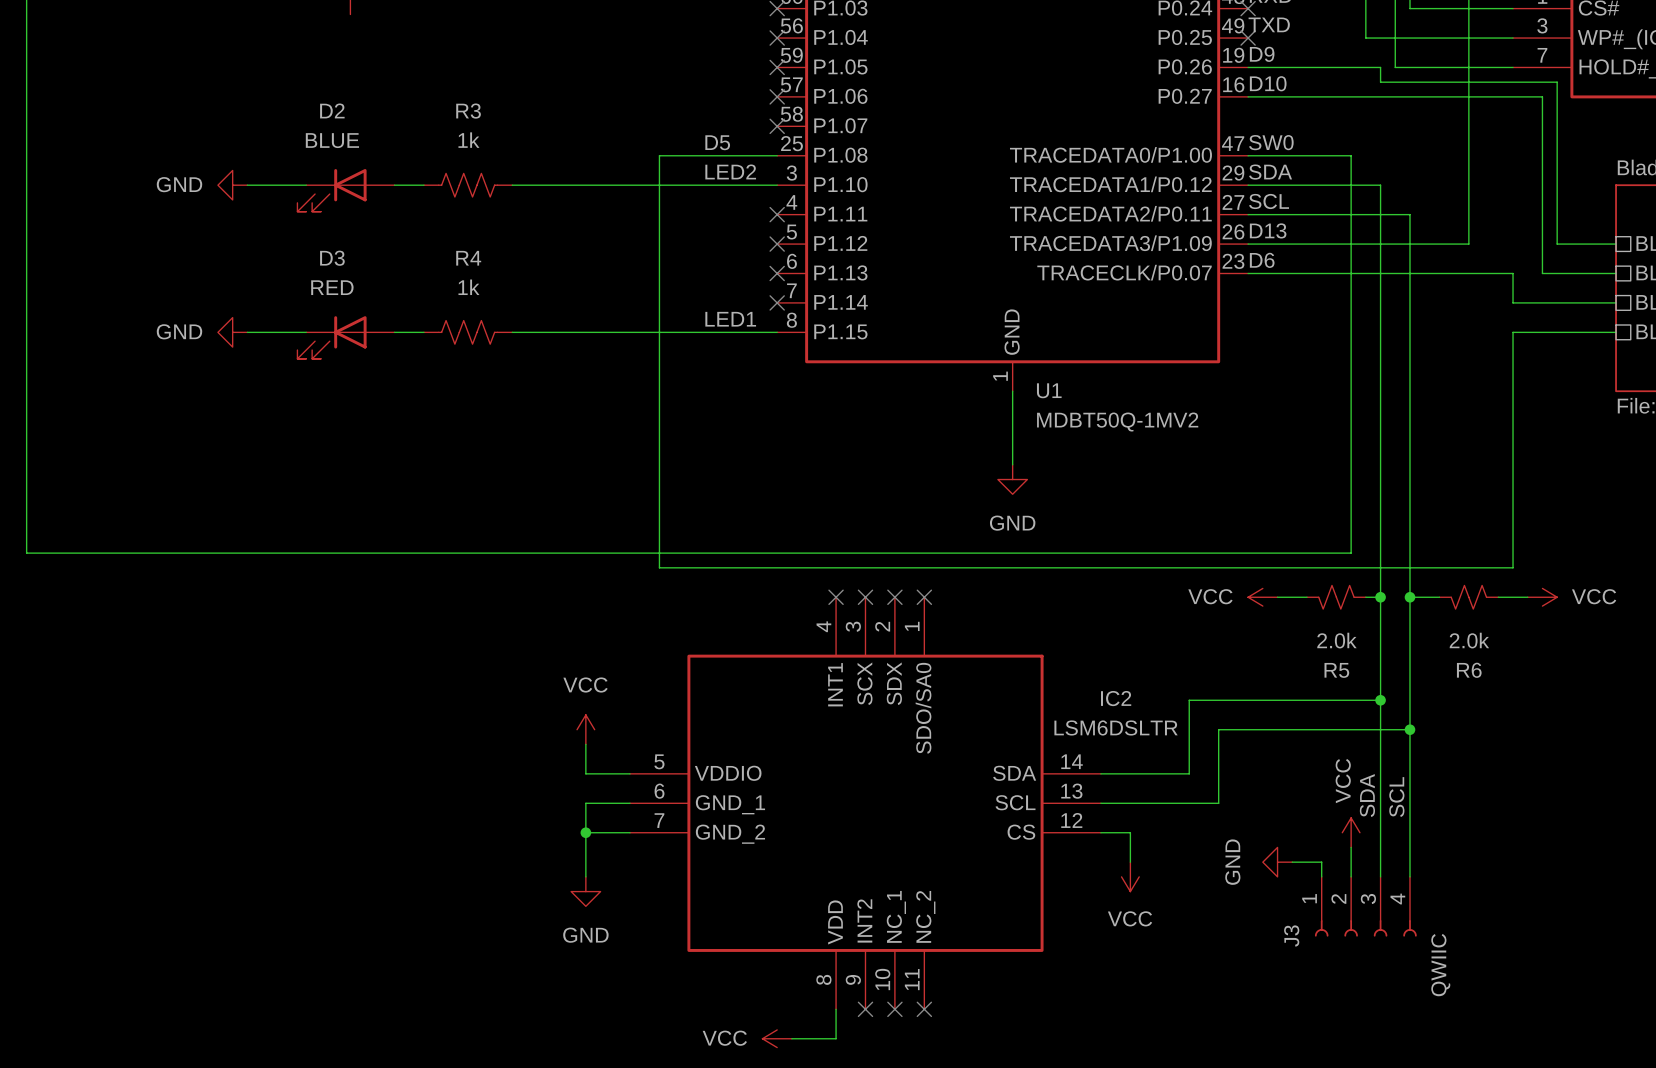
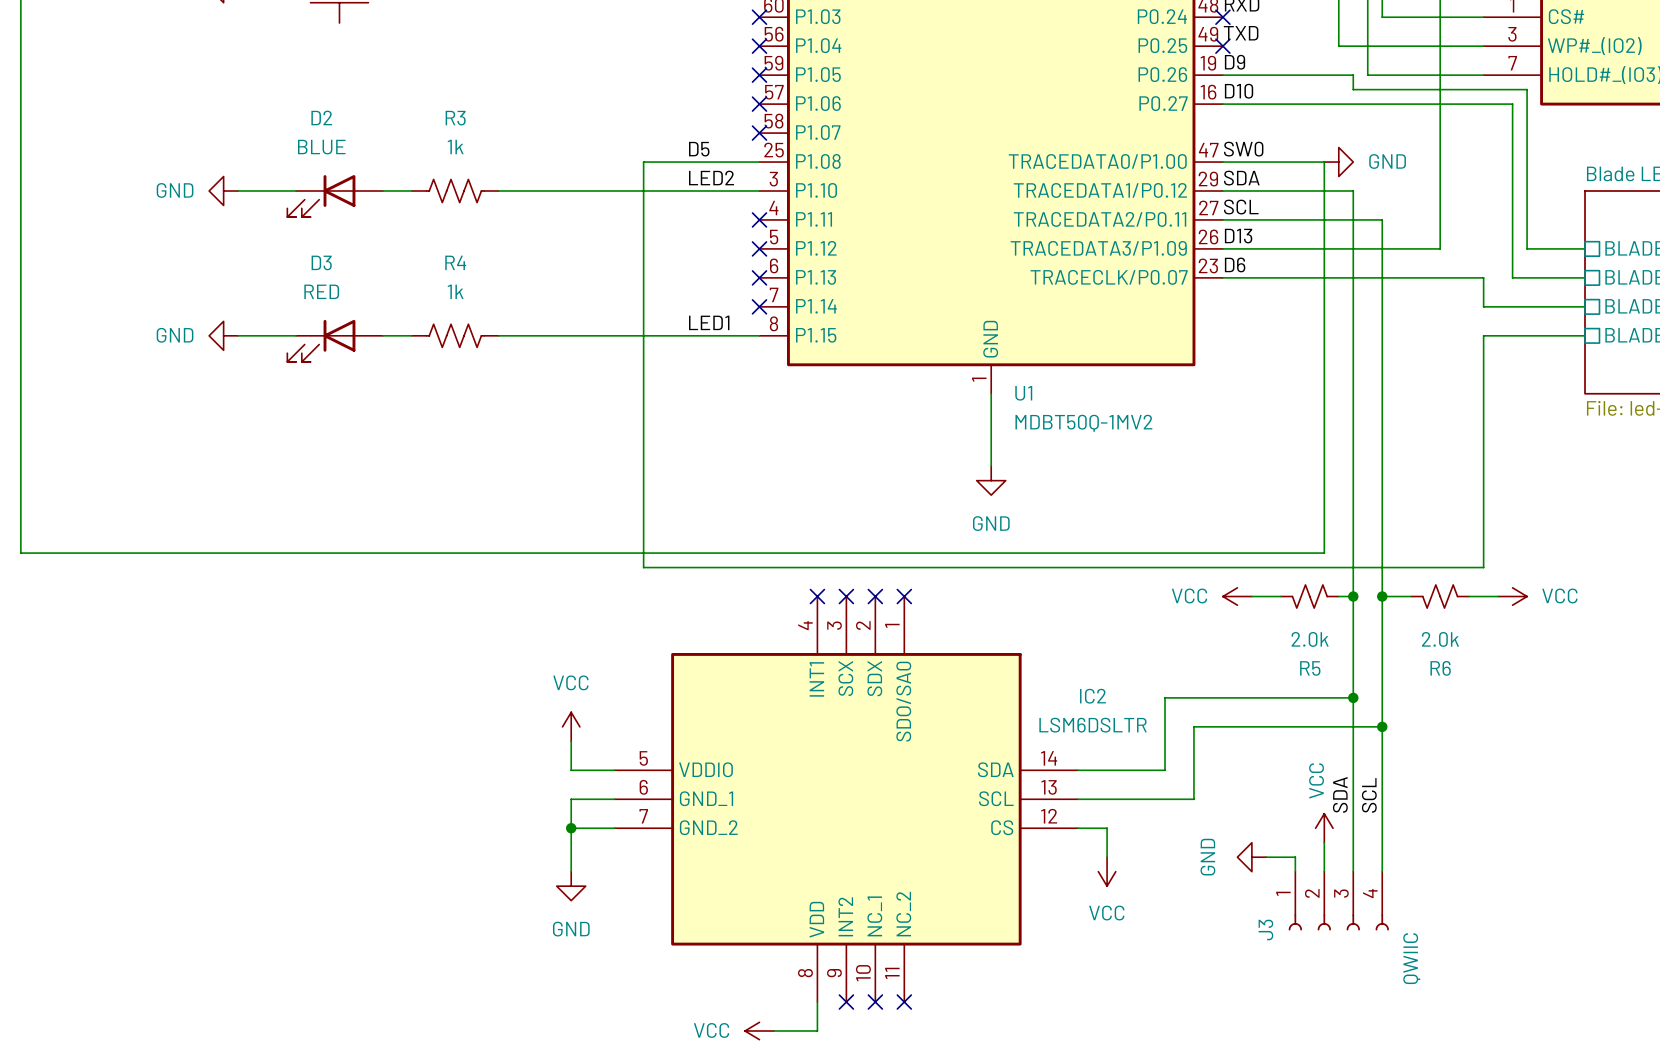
power symbol: none -> GND (1338, 162)

